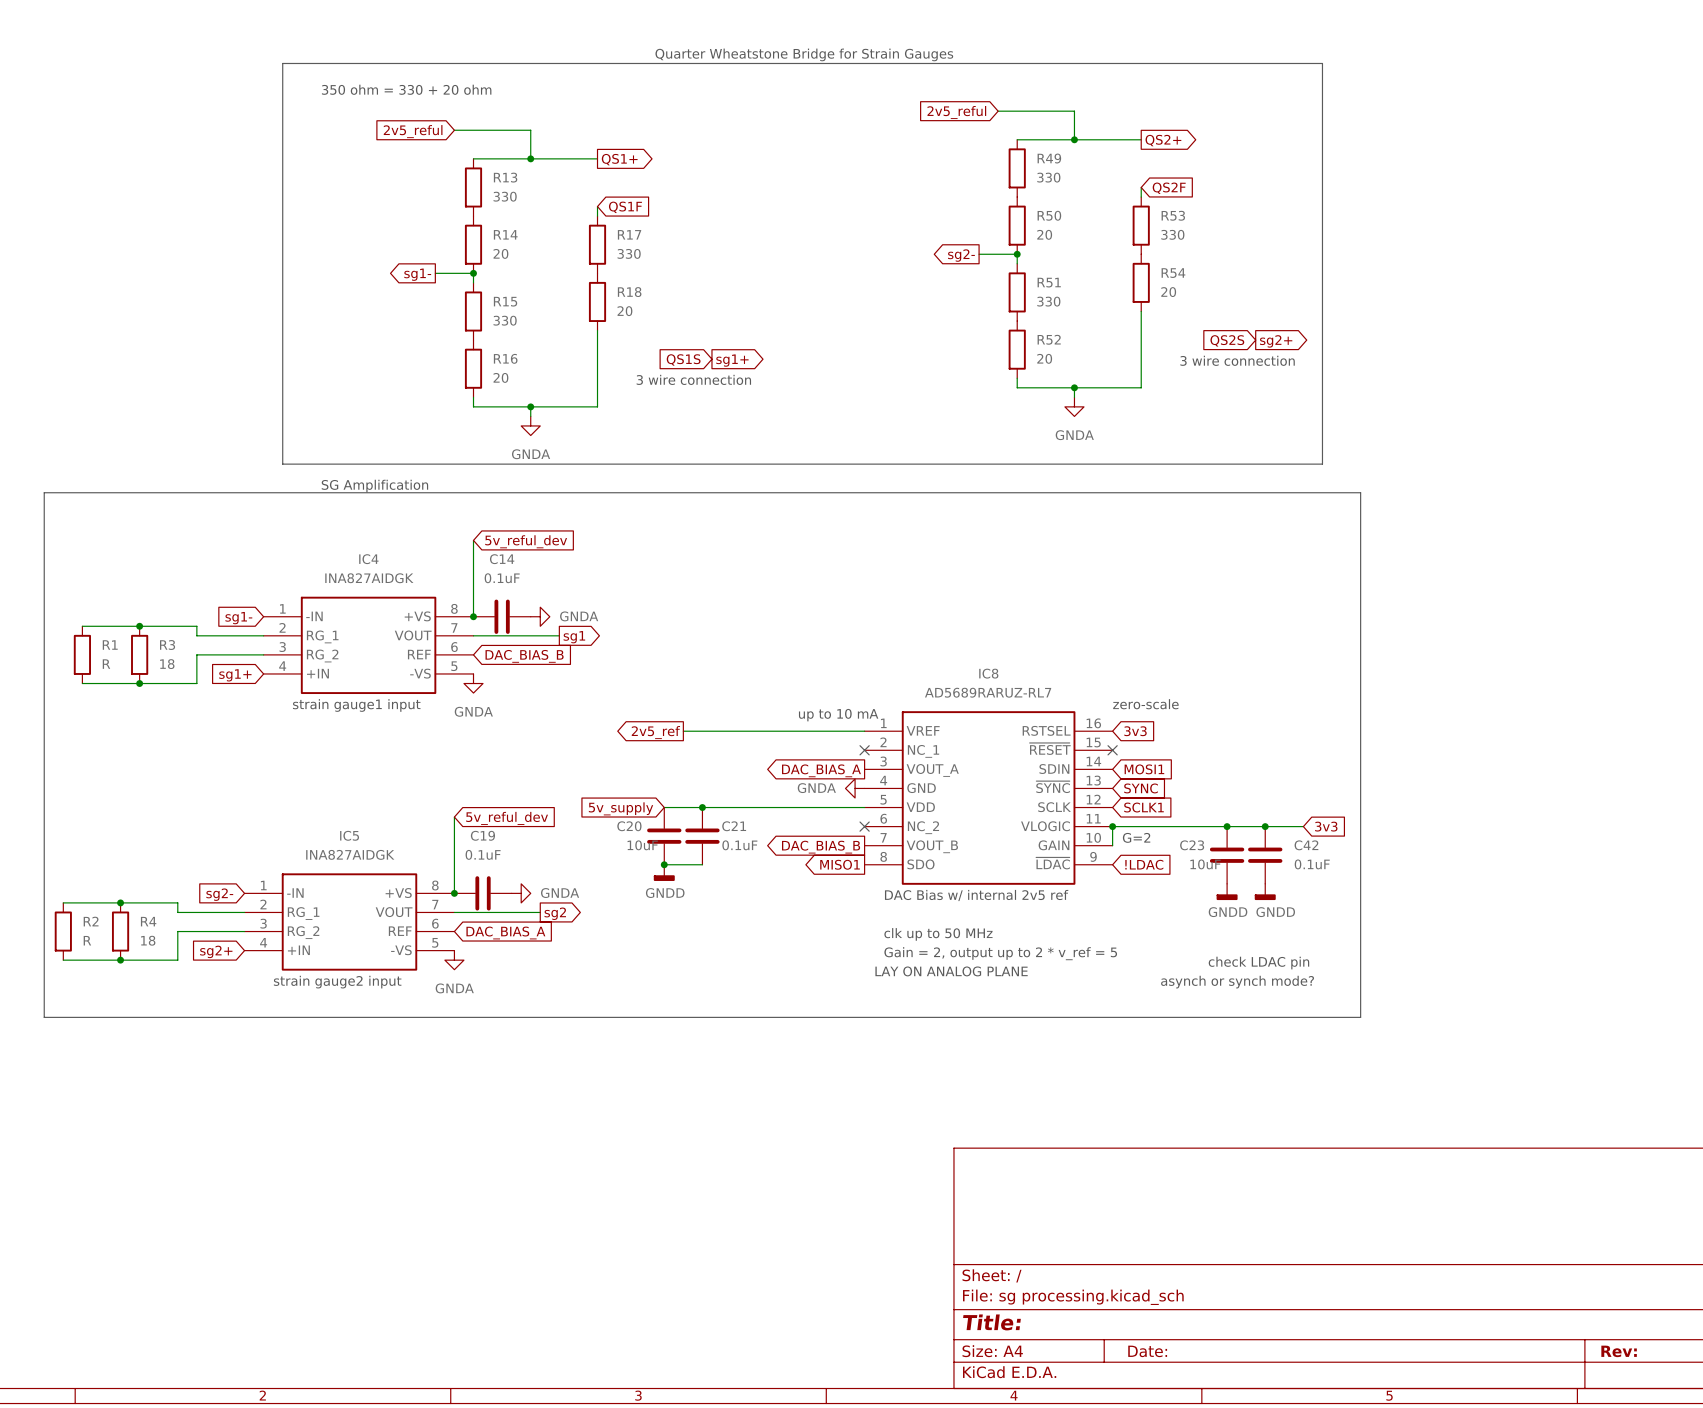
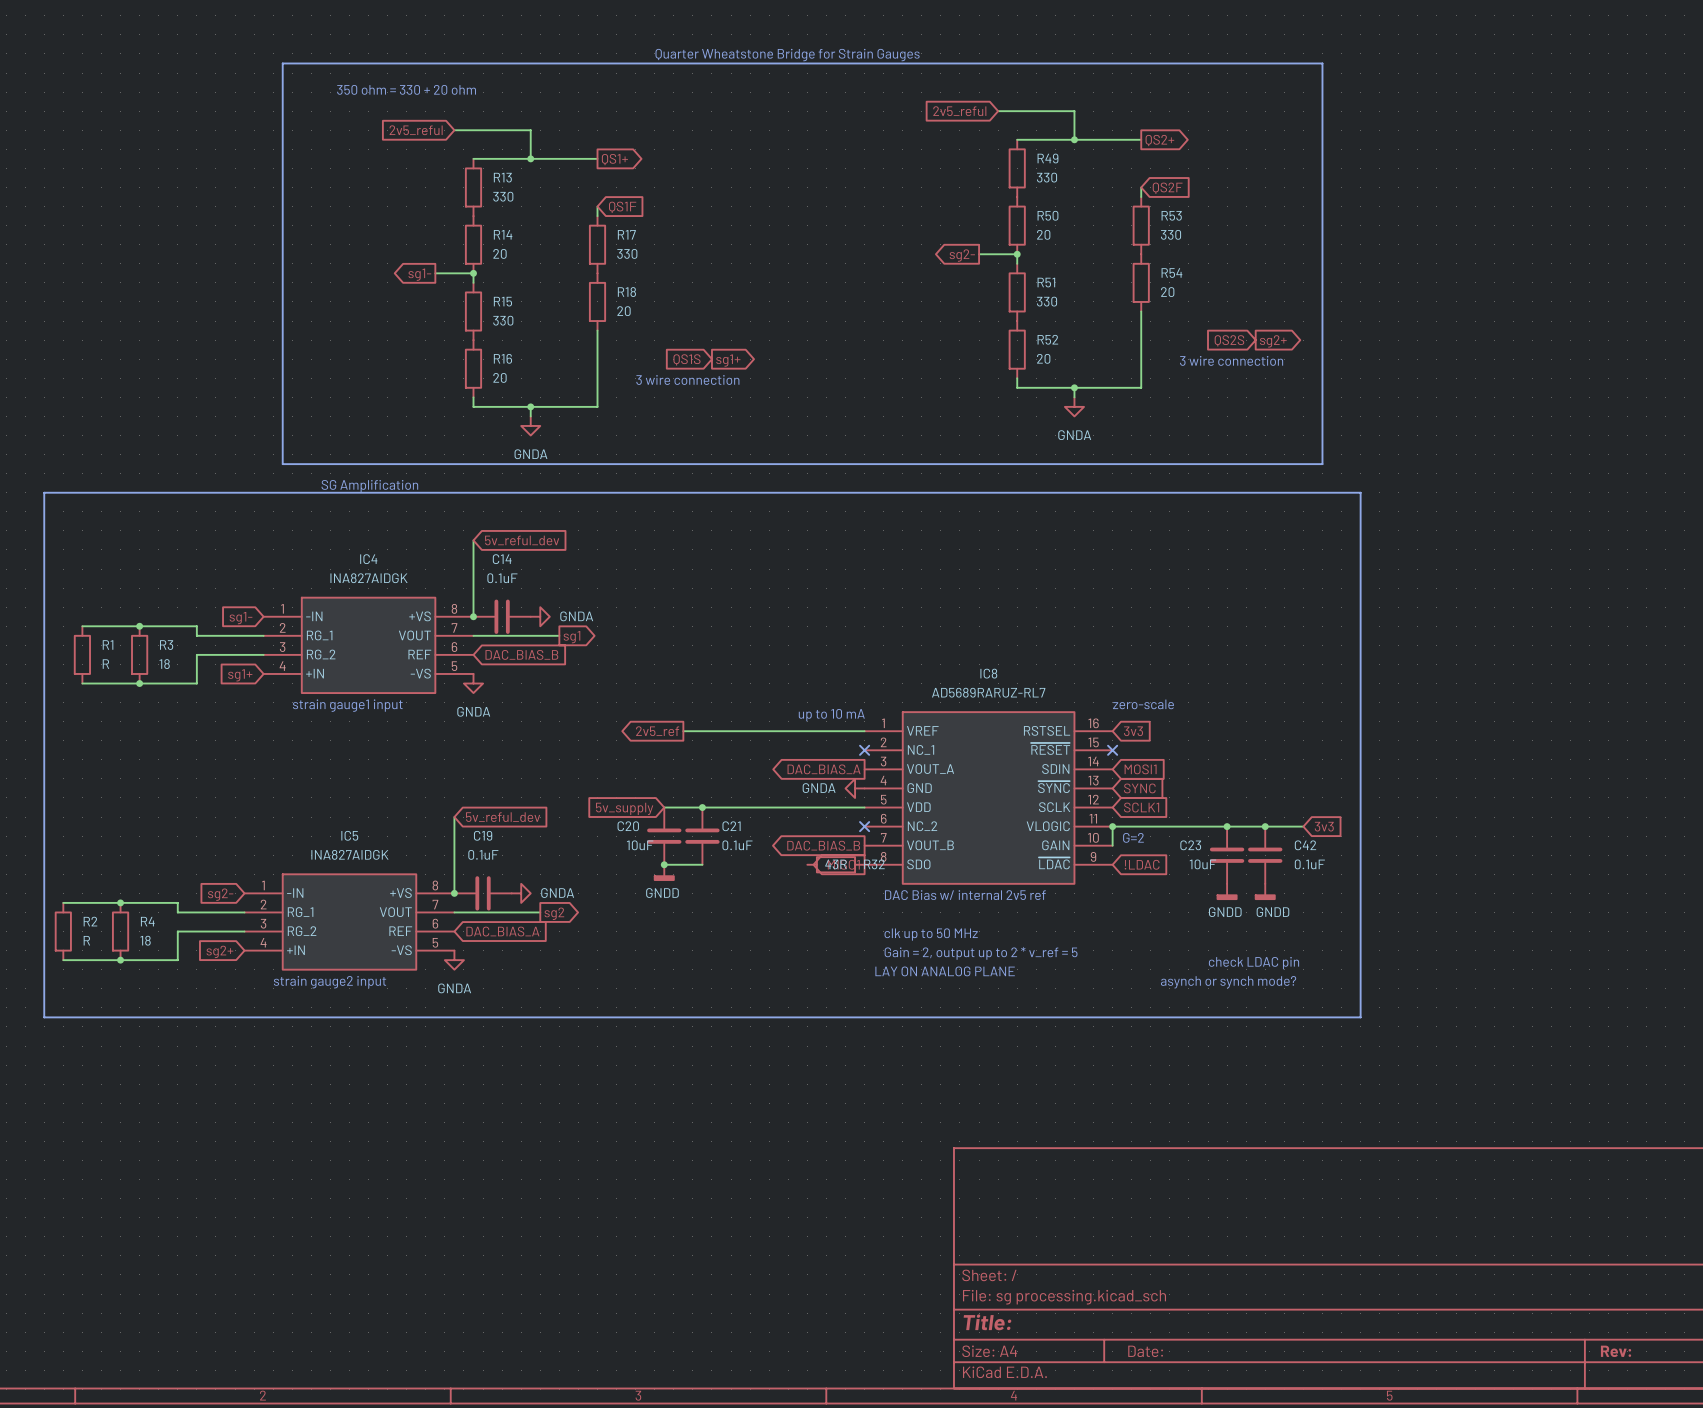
R32: none -> 43R (835, 864)

